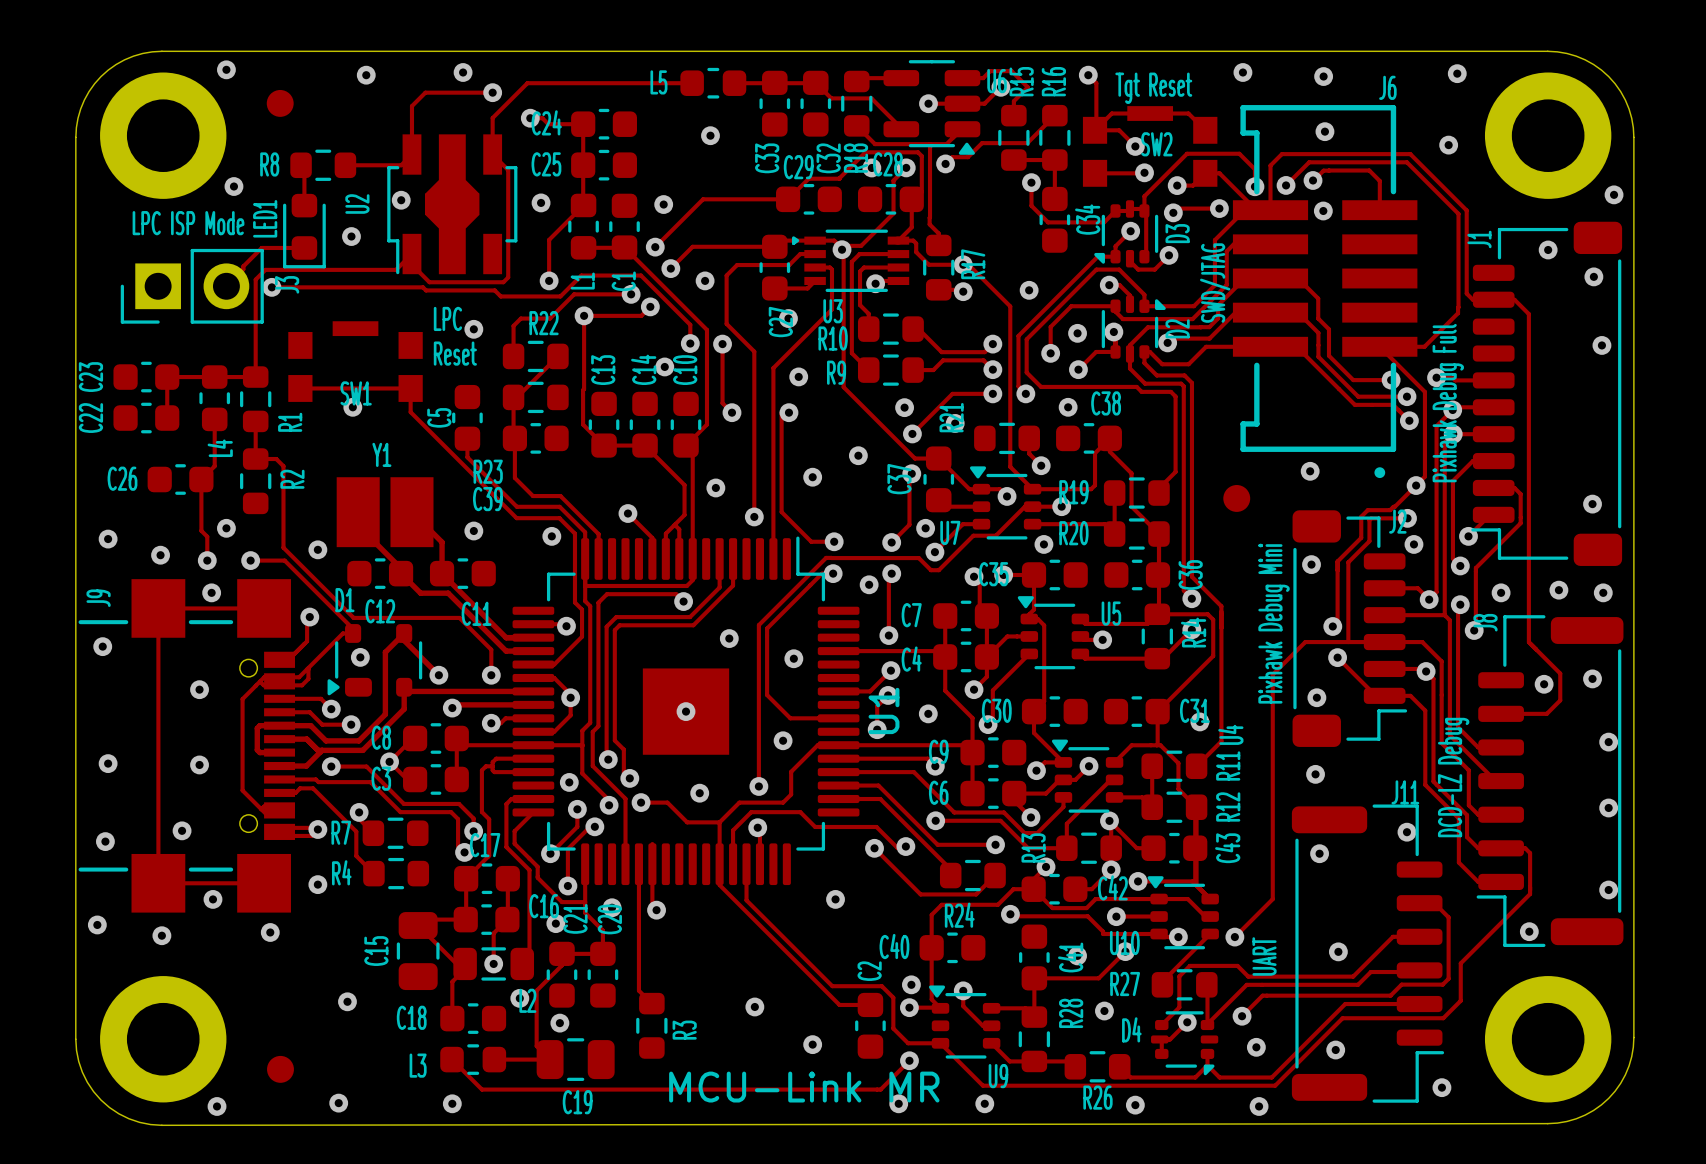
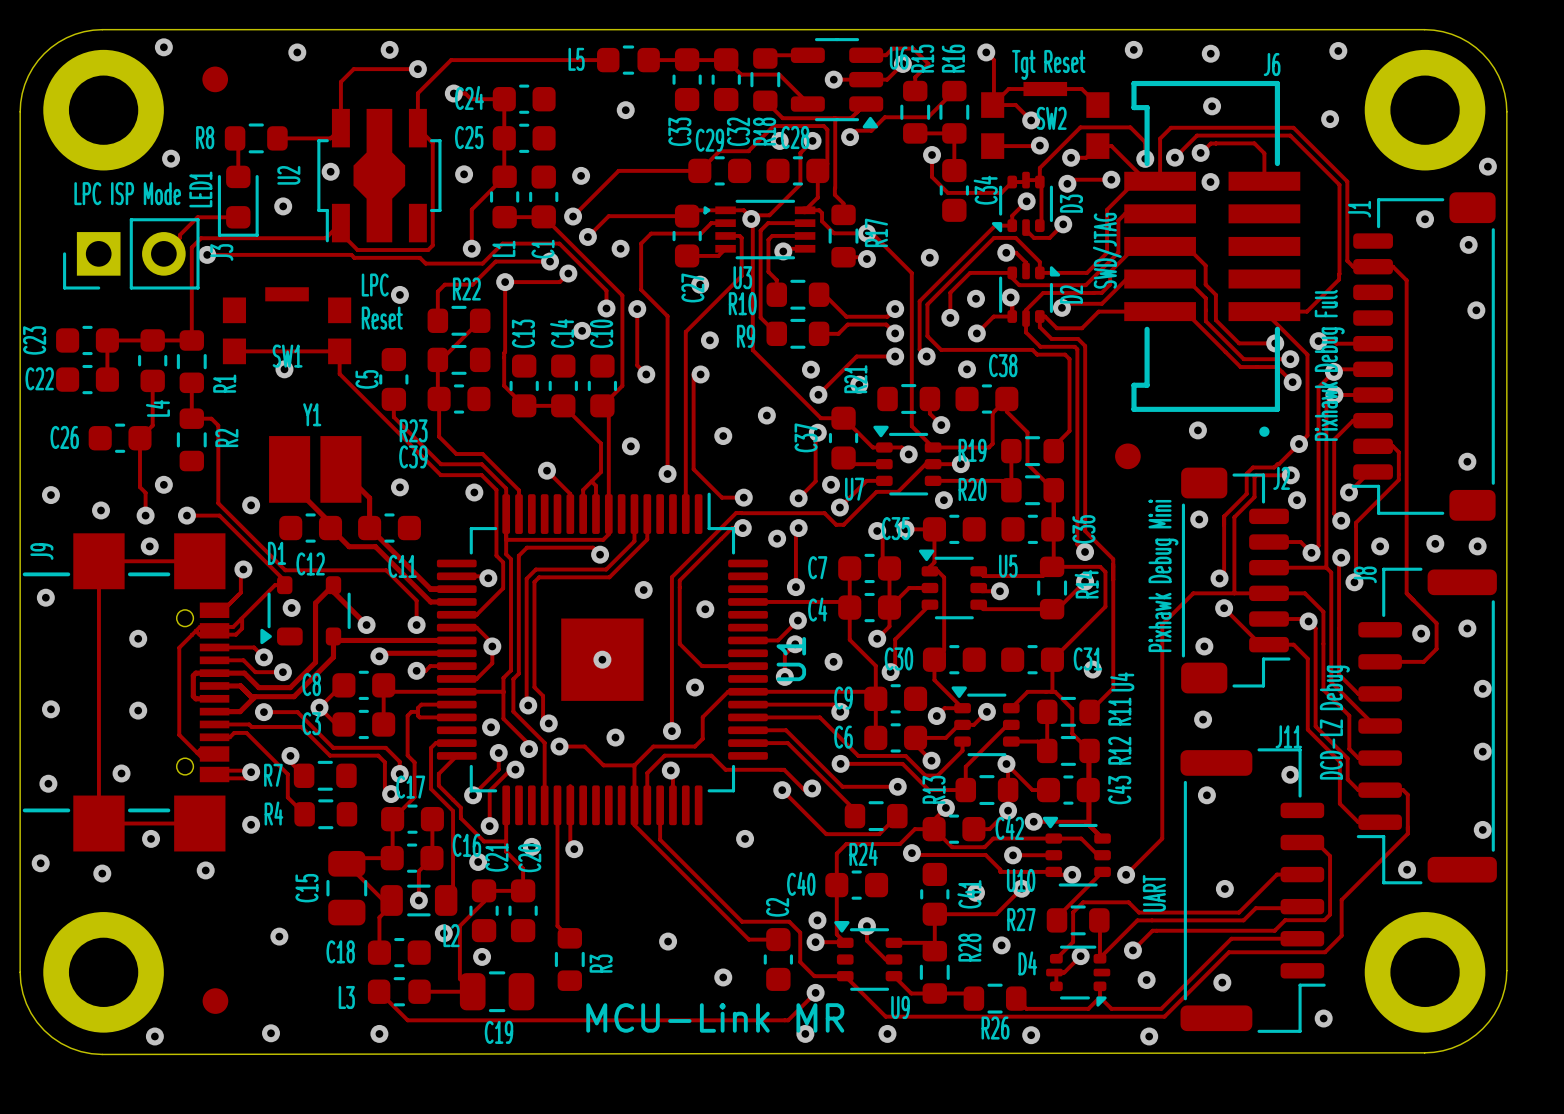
C22 name rotation: 0° (90, 418) -> 90° clockwise (39, 378)

